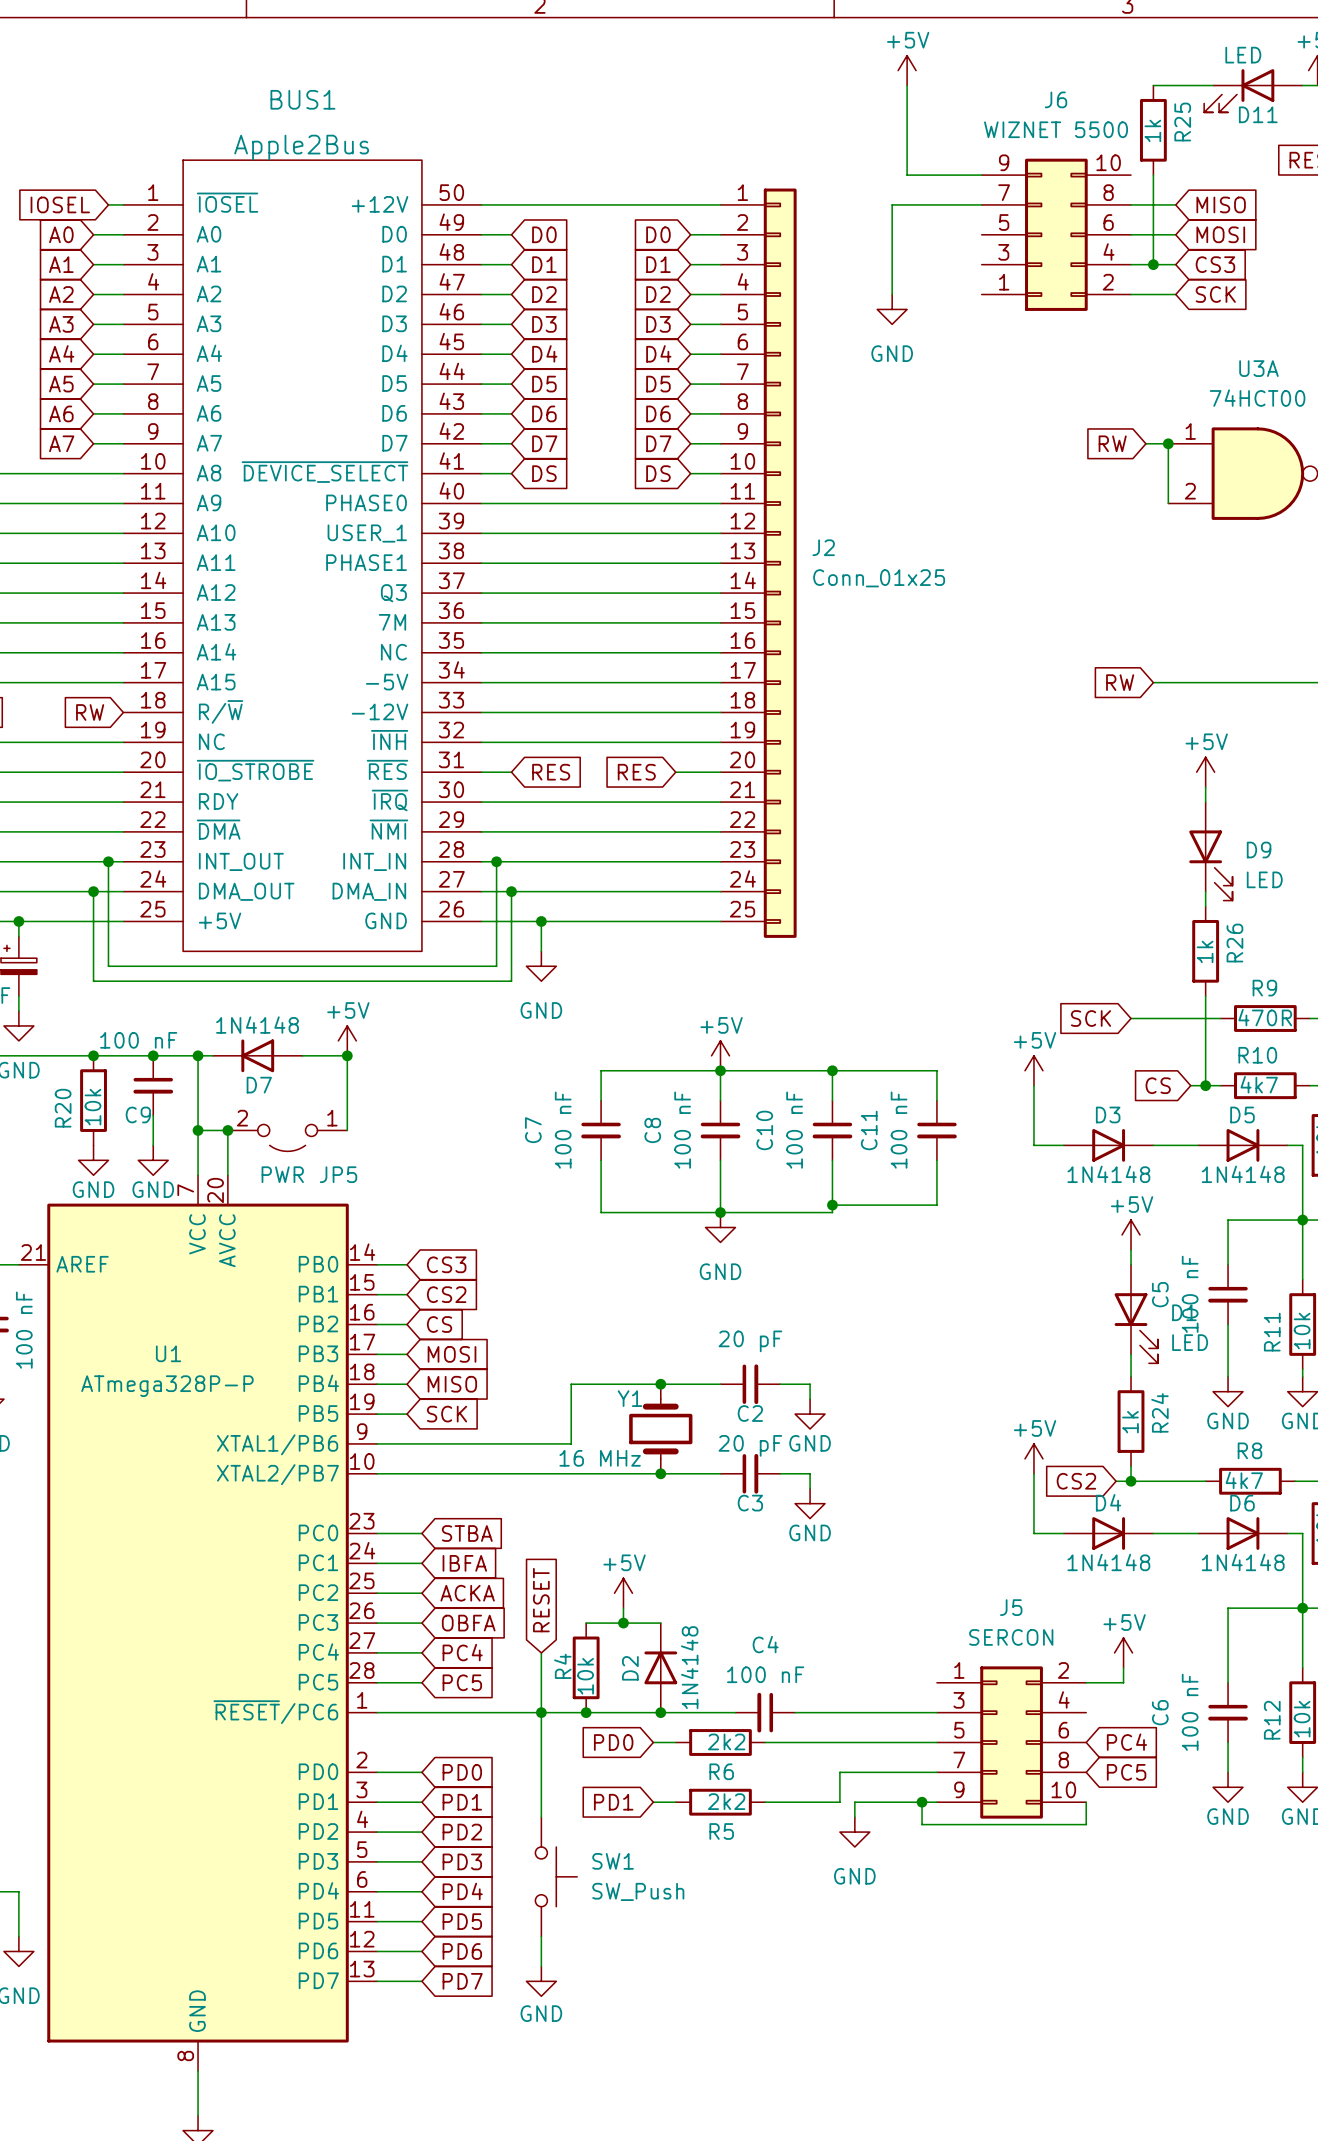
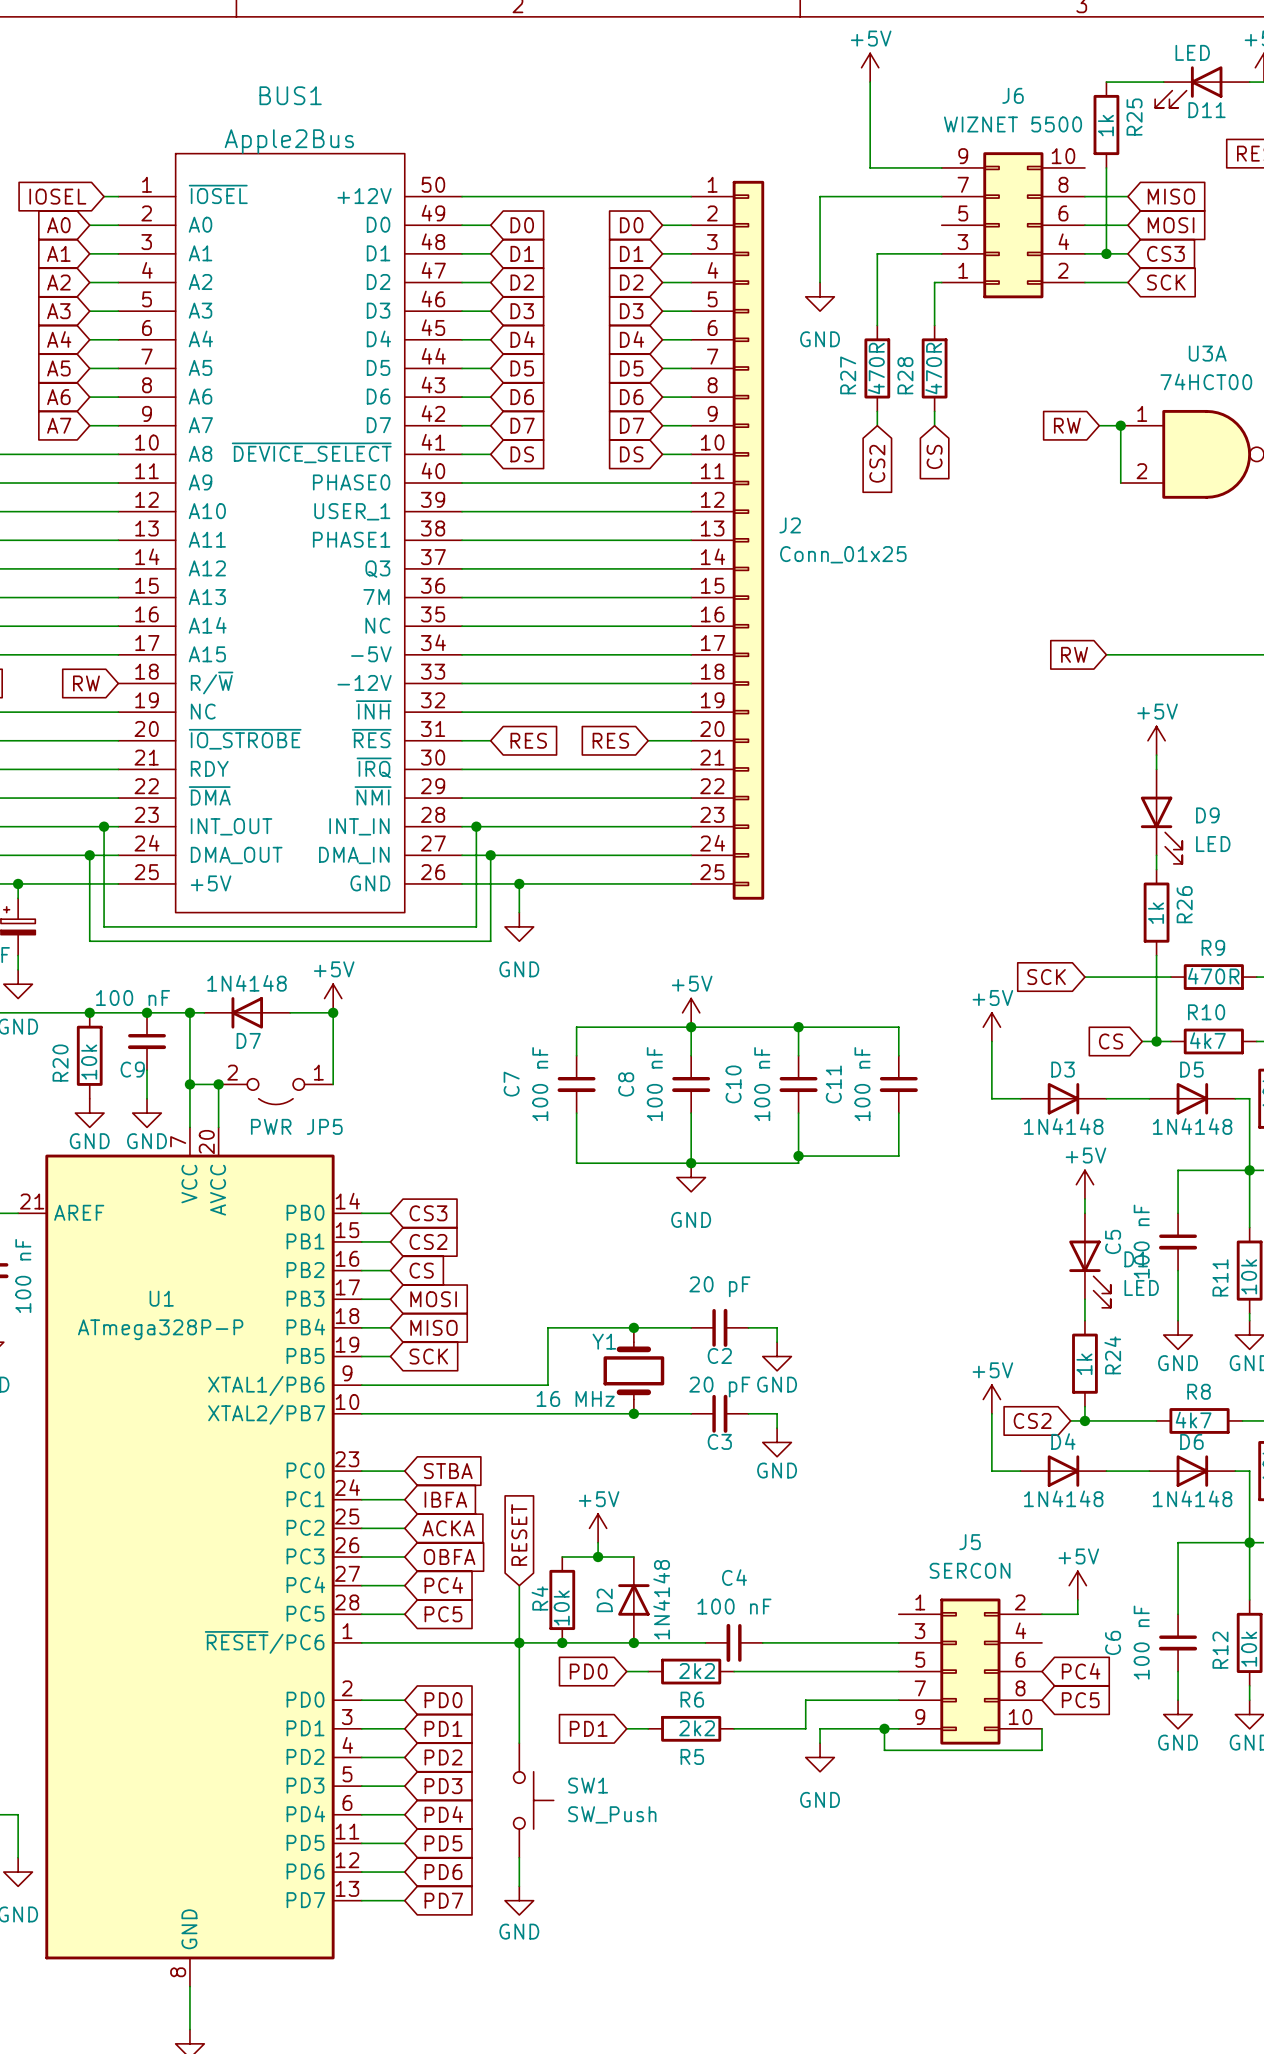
wire: (892, 204) (892, 294) -> (855, 196) (820, 196) (820, 282)
wire: none -> (941, 253) (877, 253) (877, 325)
wire: none -> (941, 282) (934, 282) (934, 325)
power symbol position: GND (892, 309) -> GND (820, 296)
R27: none -> 470R (877, 368)
R28: none -> 470R (934, 368)
wire: none -> (877, 411) (877, 425)
wire: none -> (934, 411) (934, 425)
global label: none -> CS (934, 456)
global label: none -> CS2 (877, 463)

